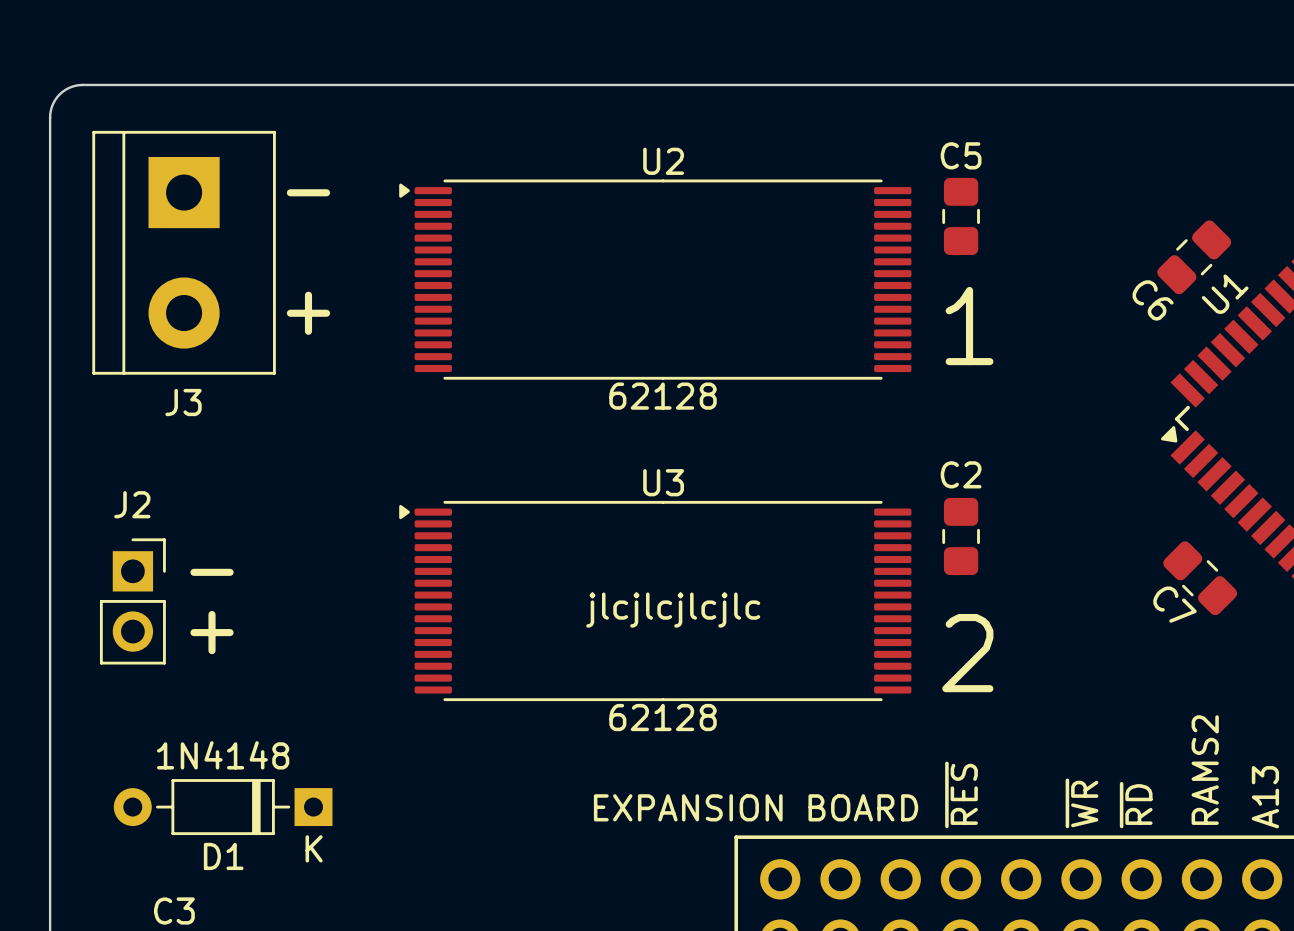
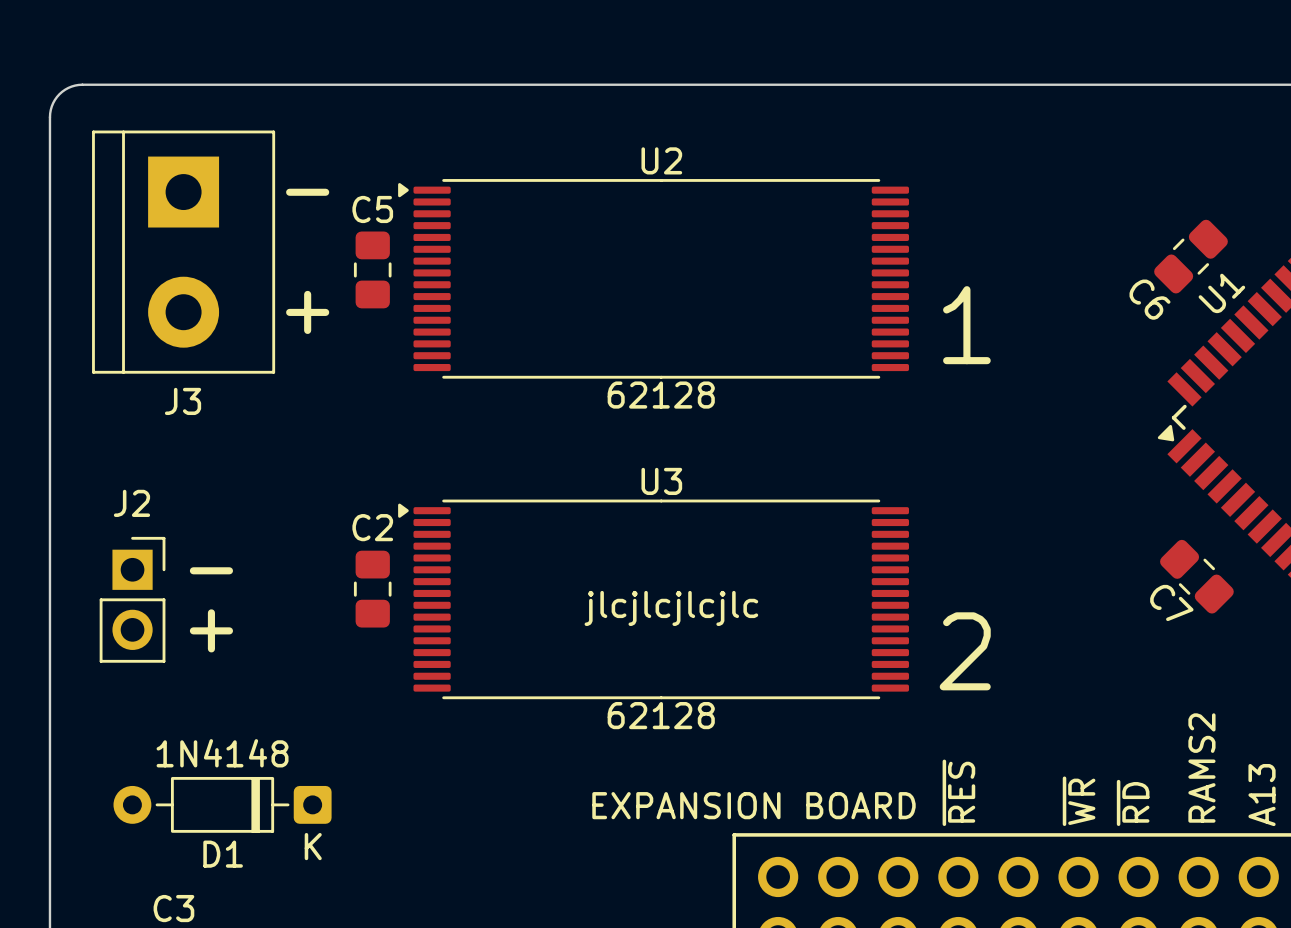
C5 position: (961, 216) -> (372, 269)
C2 position: (961, 536) -> (372, 589)
D1 footprint: [113, 779, 333, 836] -> [113, 776, 332, 833]

